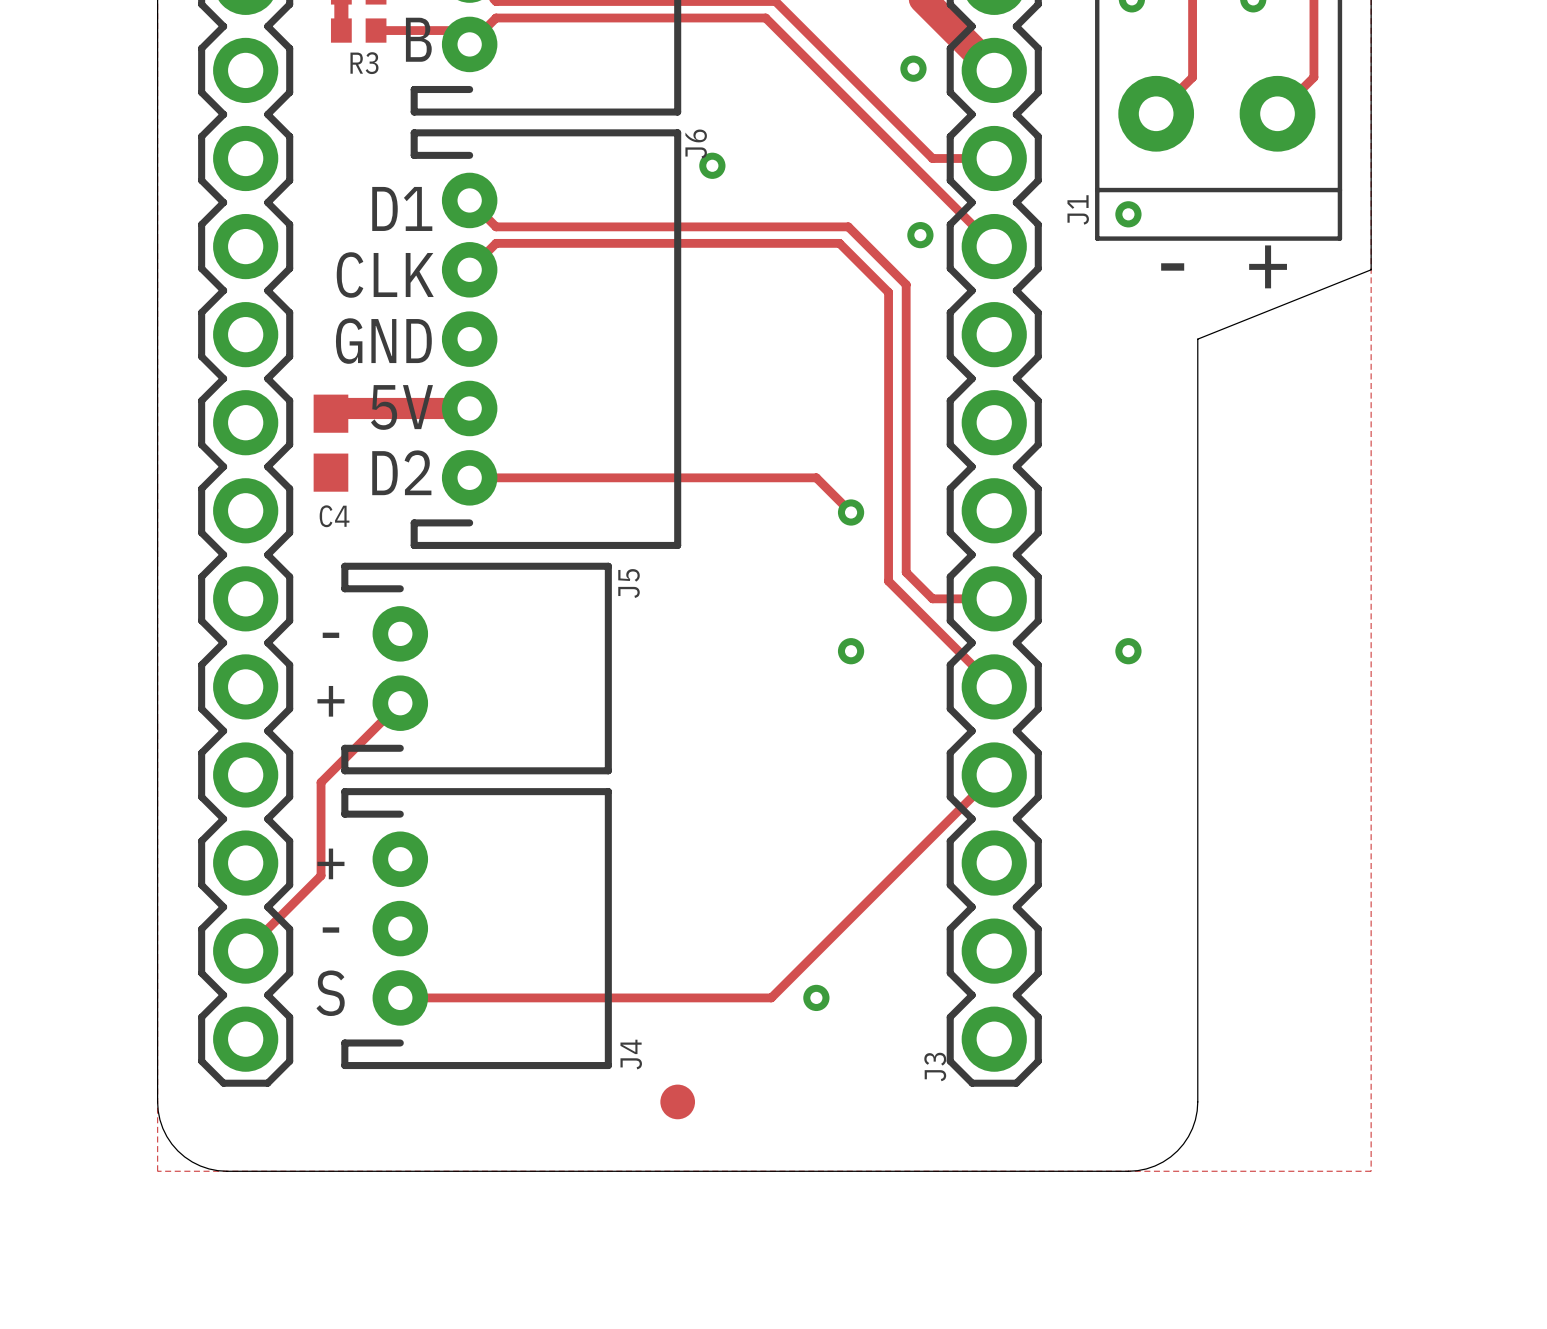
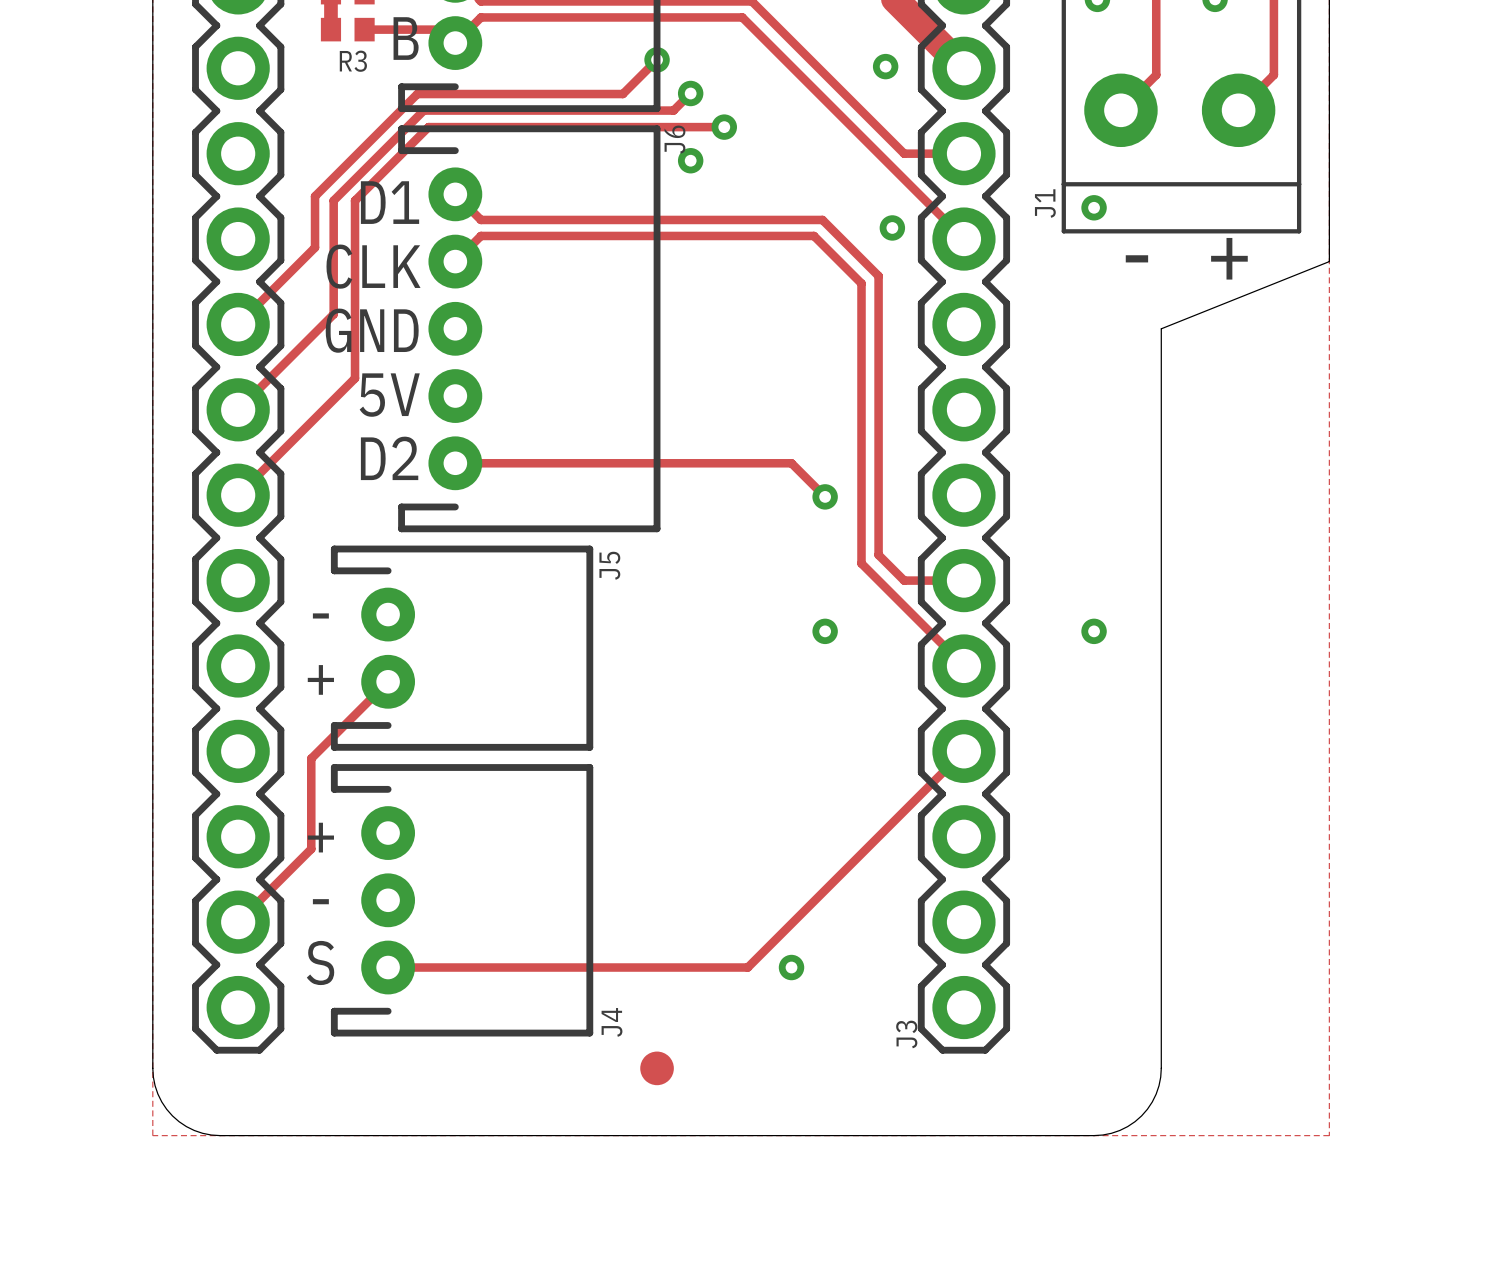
track: none -> (657, 59) (622, 94) (417, 94) (315, 196) (315, 247) (238, 324)
via: none -> (657, 59)
track: none -> (690, 93) (673, 110) (423, 110) (333, 200) (333, 314) (238, 409)
via: none -> (690, 93)
track: none -> (724, 127) (428, 127) (355, 200) (355, 378) (238, 495)
via: none -> (724, 127)
track: (469, 408) (336, 408) (330, 413) -> none
C4: (330, 443) -> none

